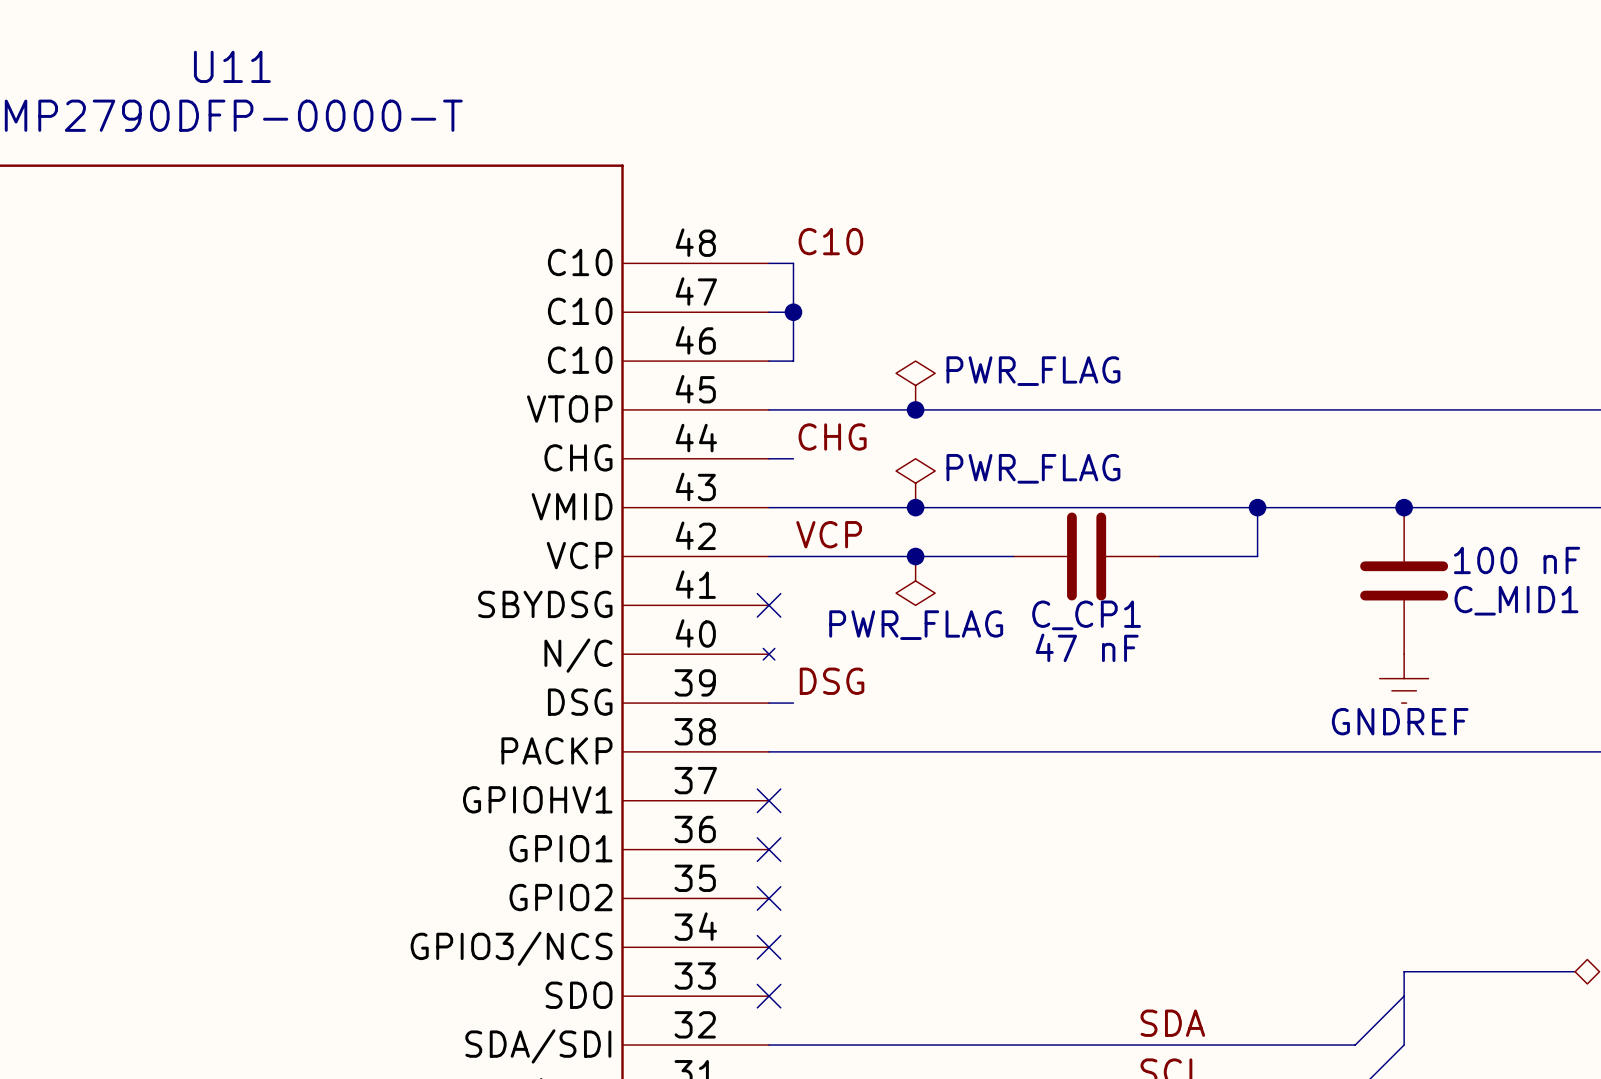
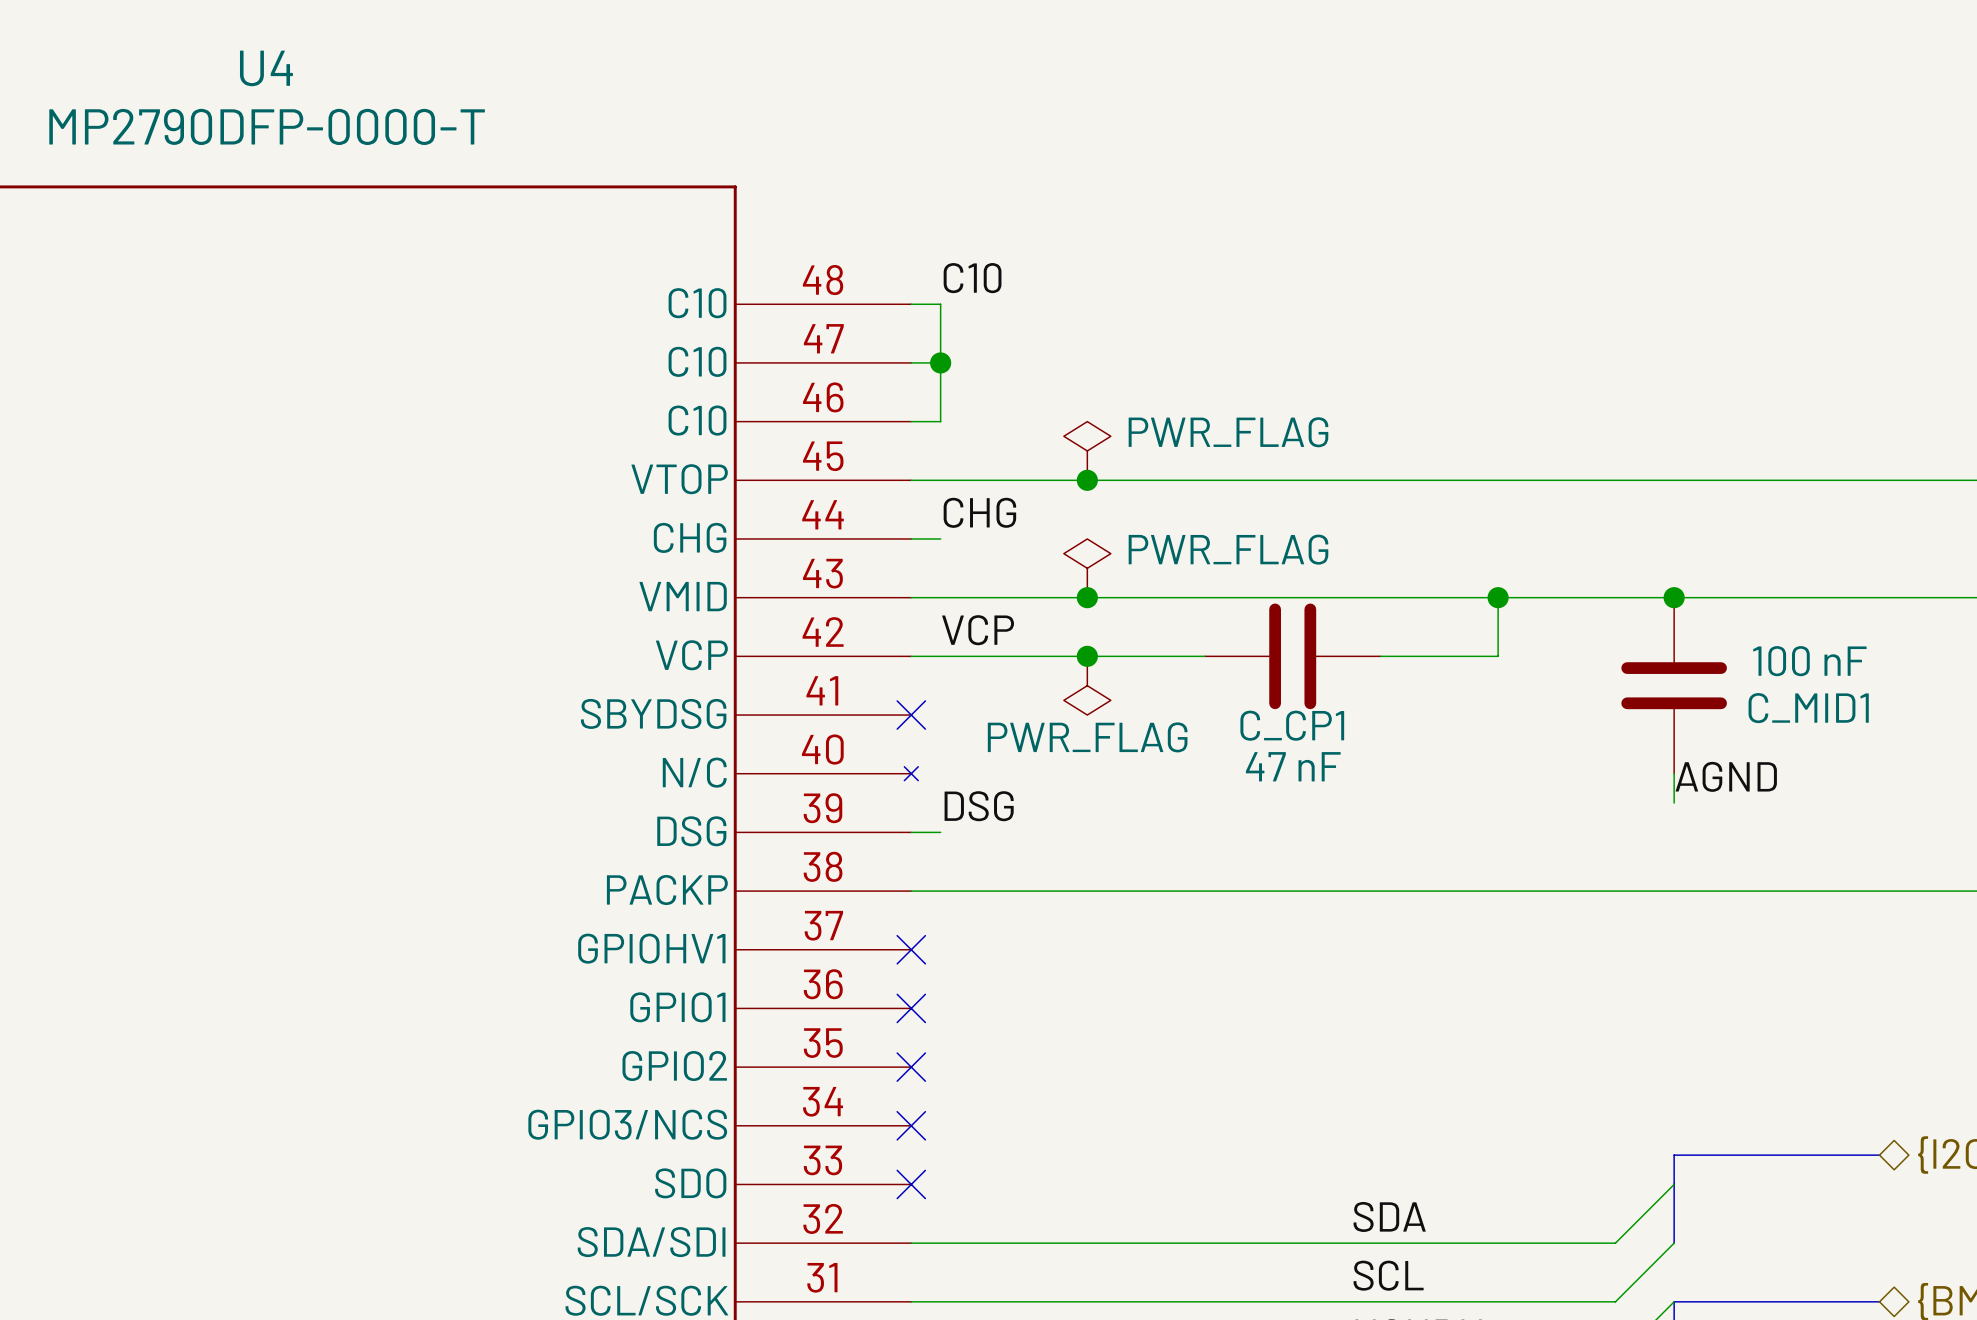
U11 name: U11 (232, 66) -> U4 (266, 68)
label: none -> AGND (1726, 776)
power symbol: GNDREF (1404, 678) -> none

